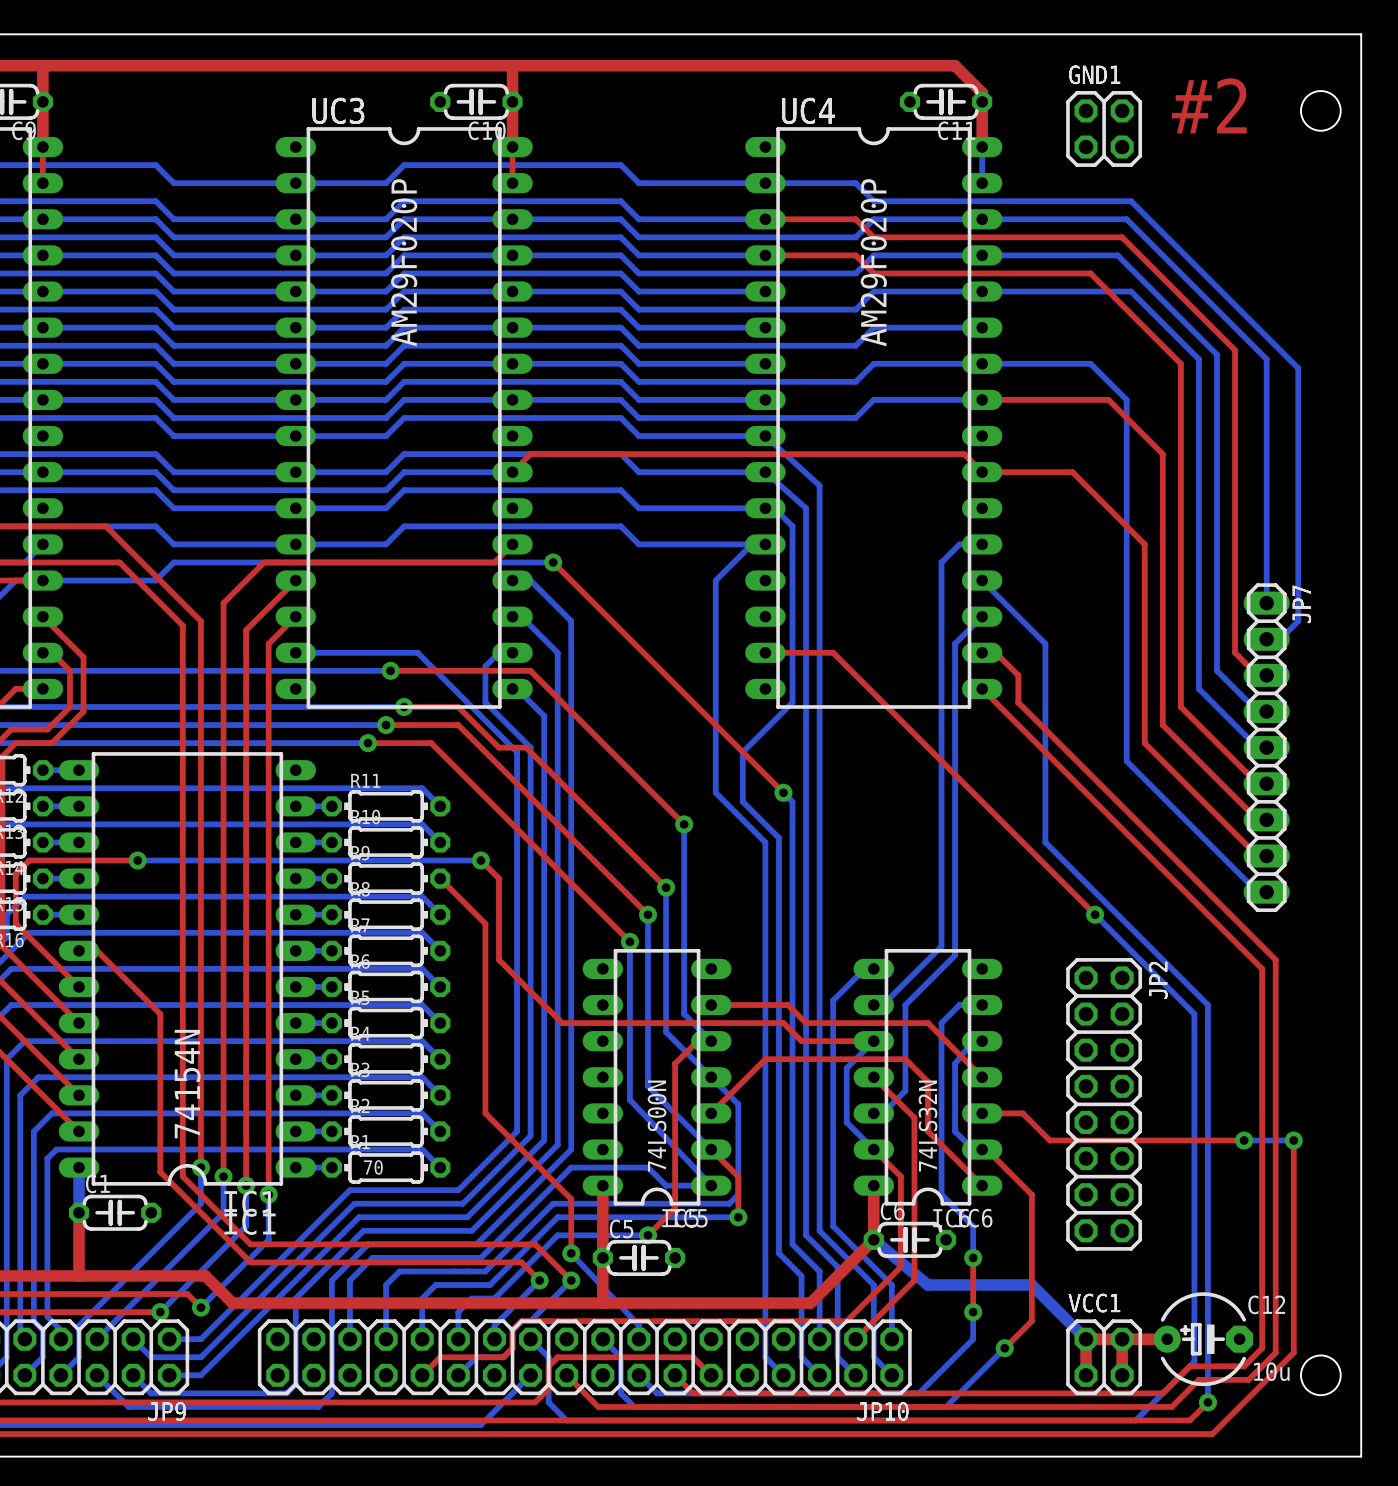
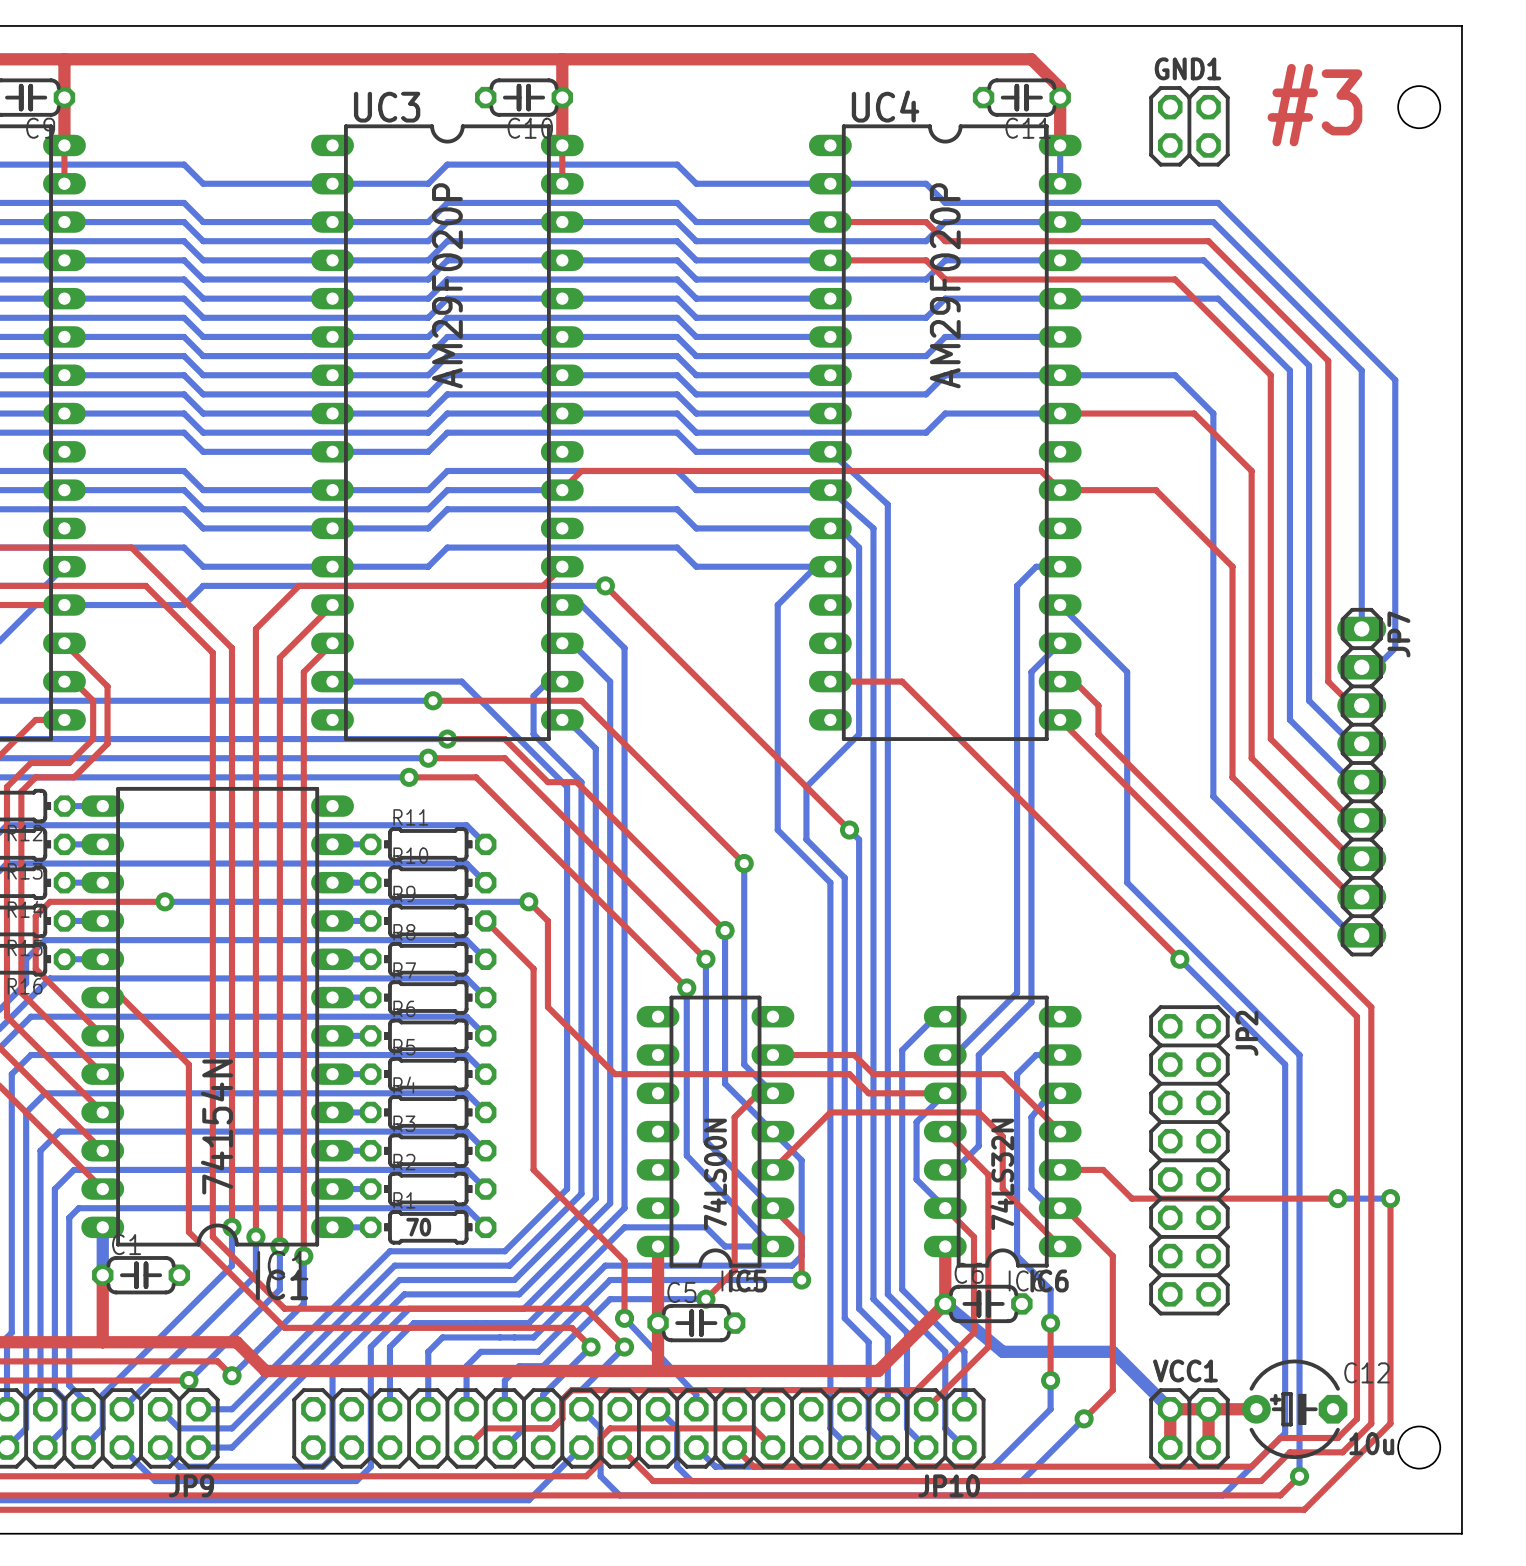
text: #2 (1209, 105) -> #3 (1314, 105)

